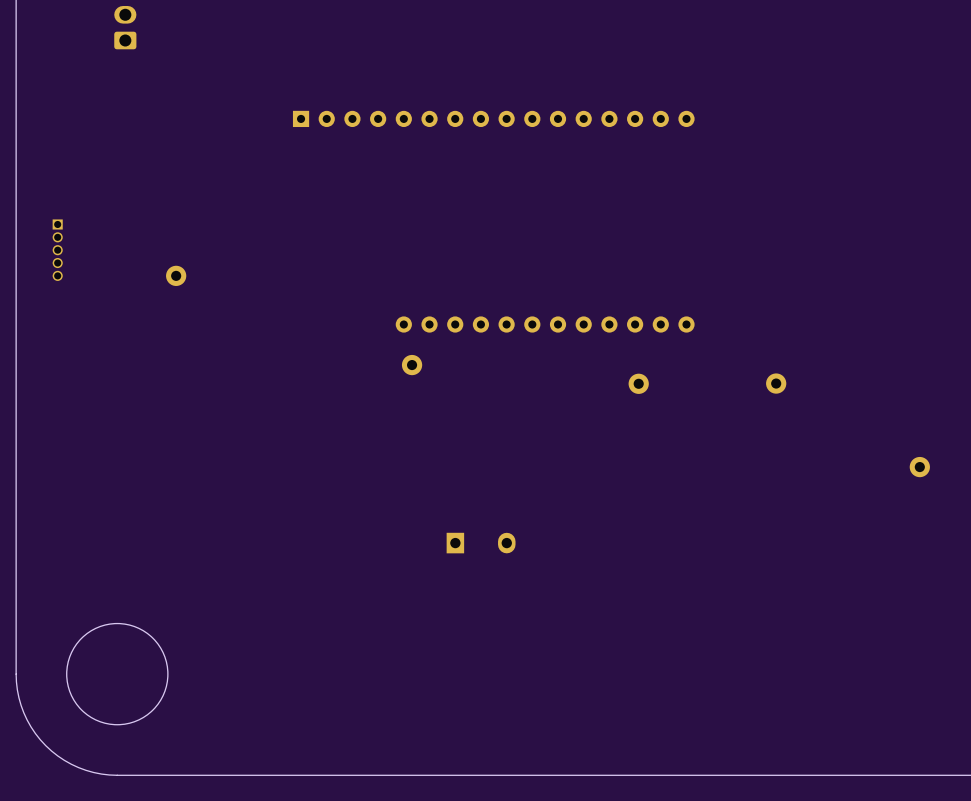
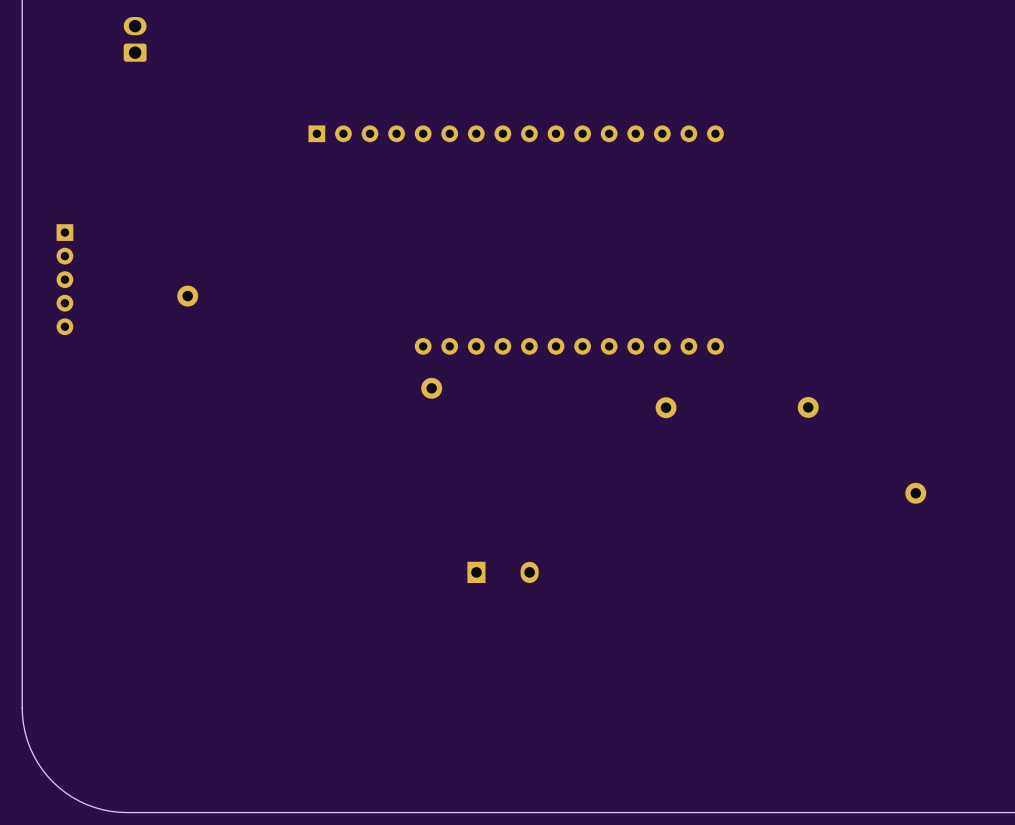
part footprint: [52, 219, 63, 281] -> [56, 224, 74, 336]
part position: (919, 467) -> (915, 493)
round board edge: [66, 623, 169, 726] -> none

